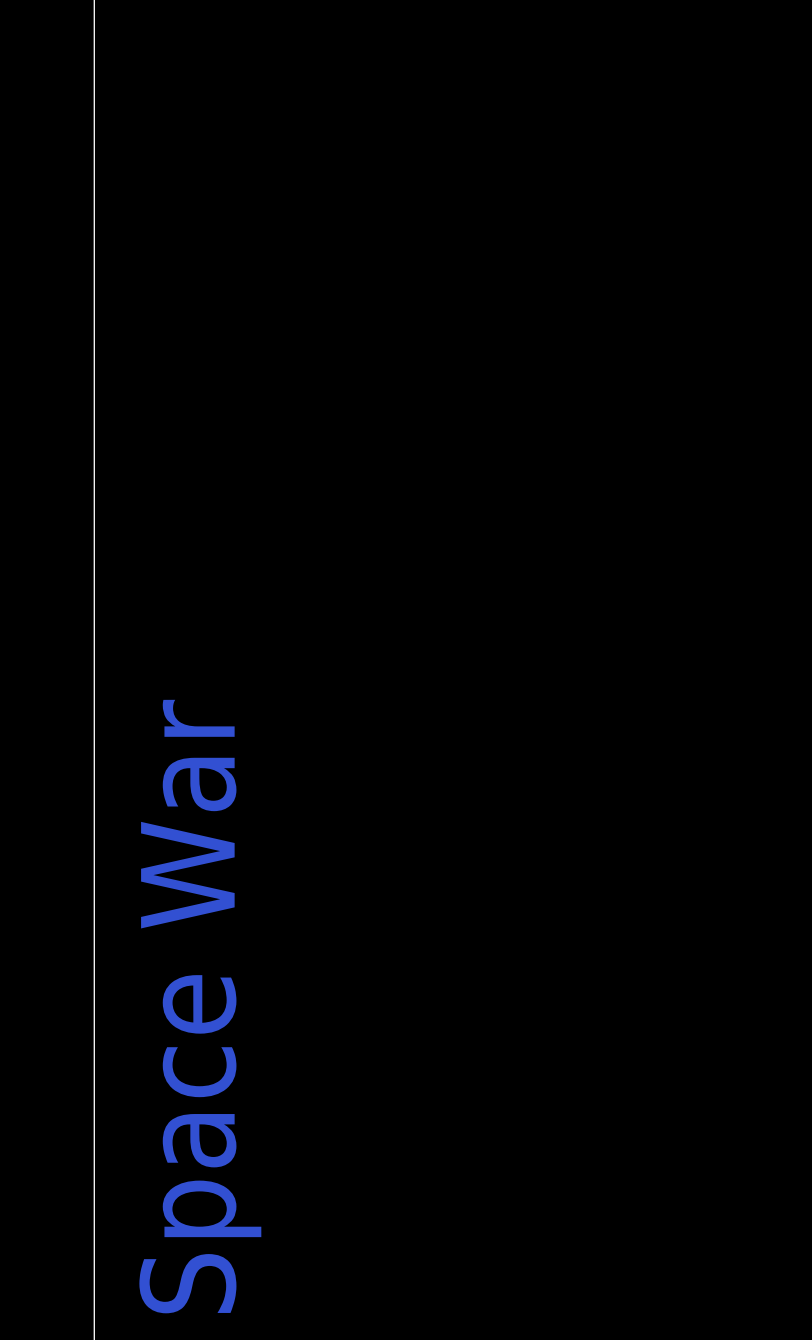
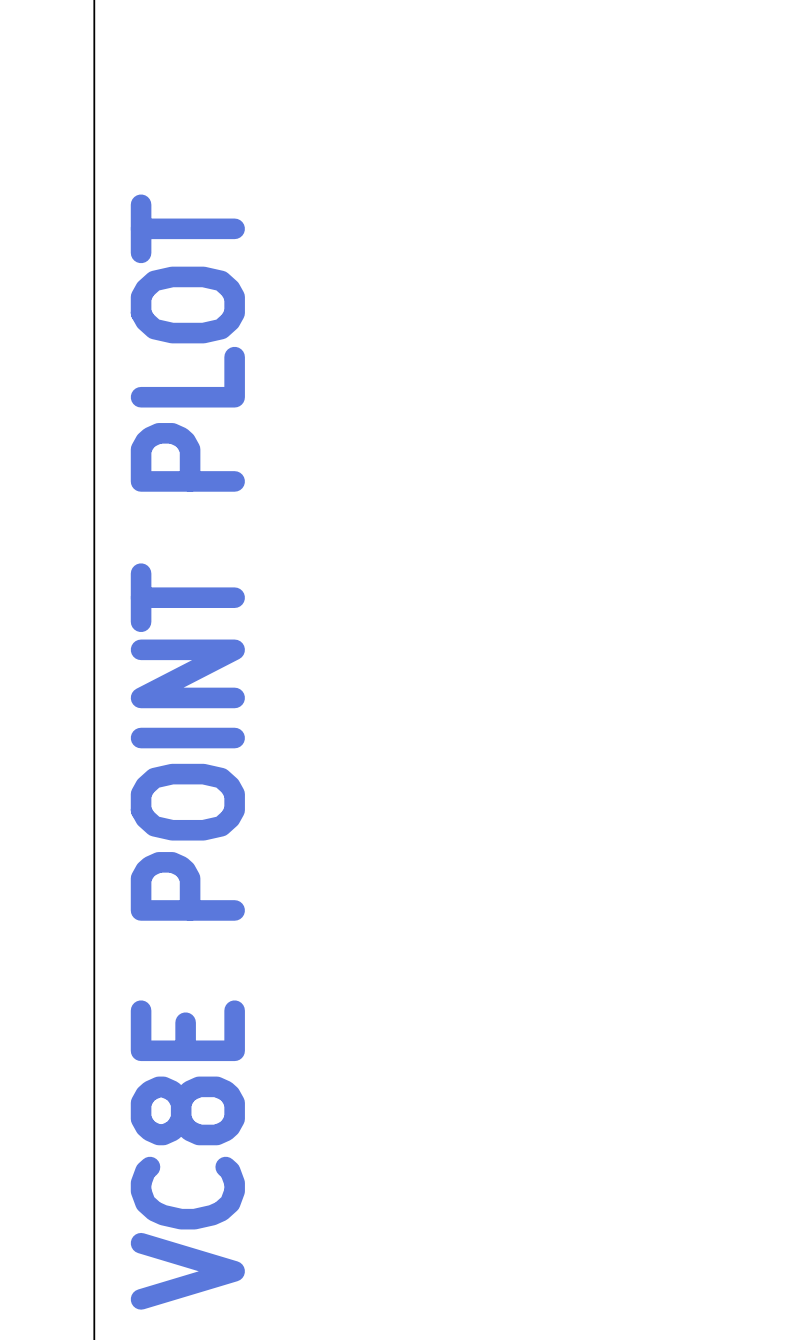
text: Space War (200, 1006) -> VC8E POINT PLOT (187, 752)

